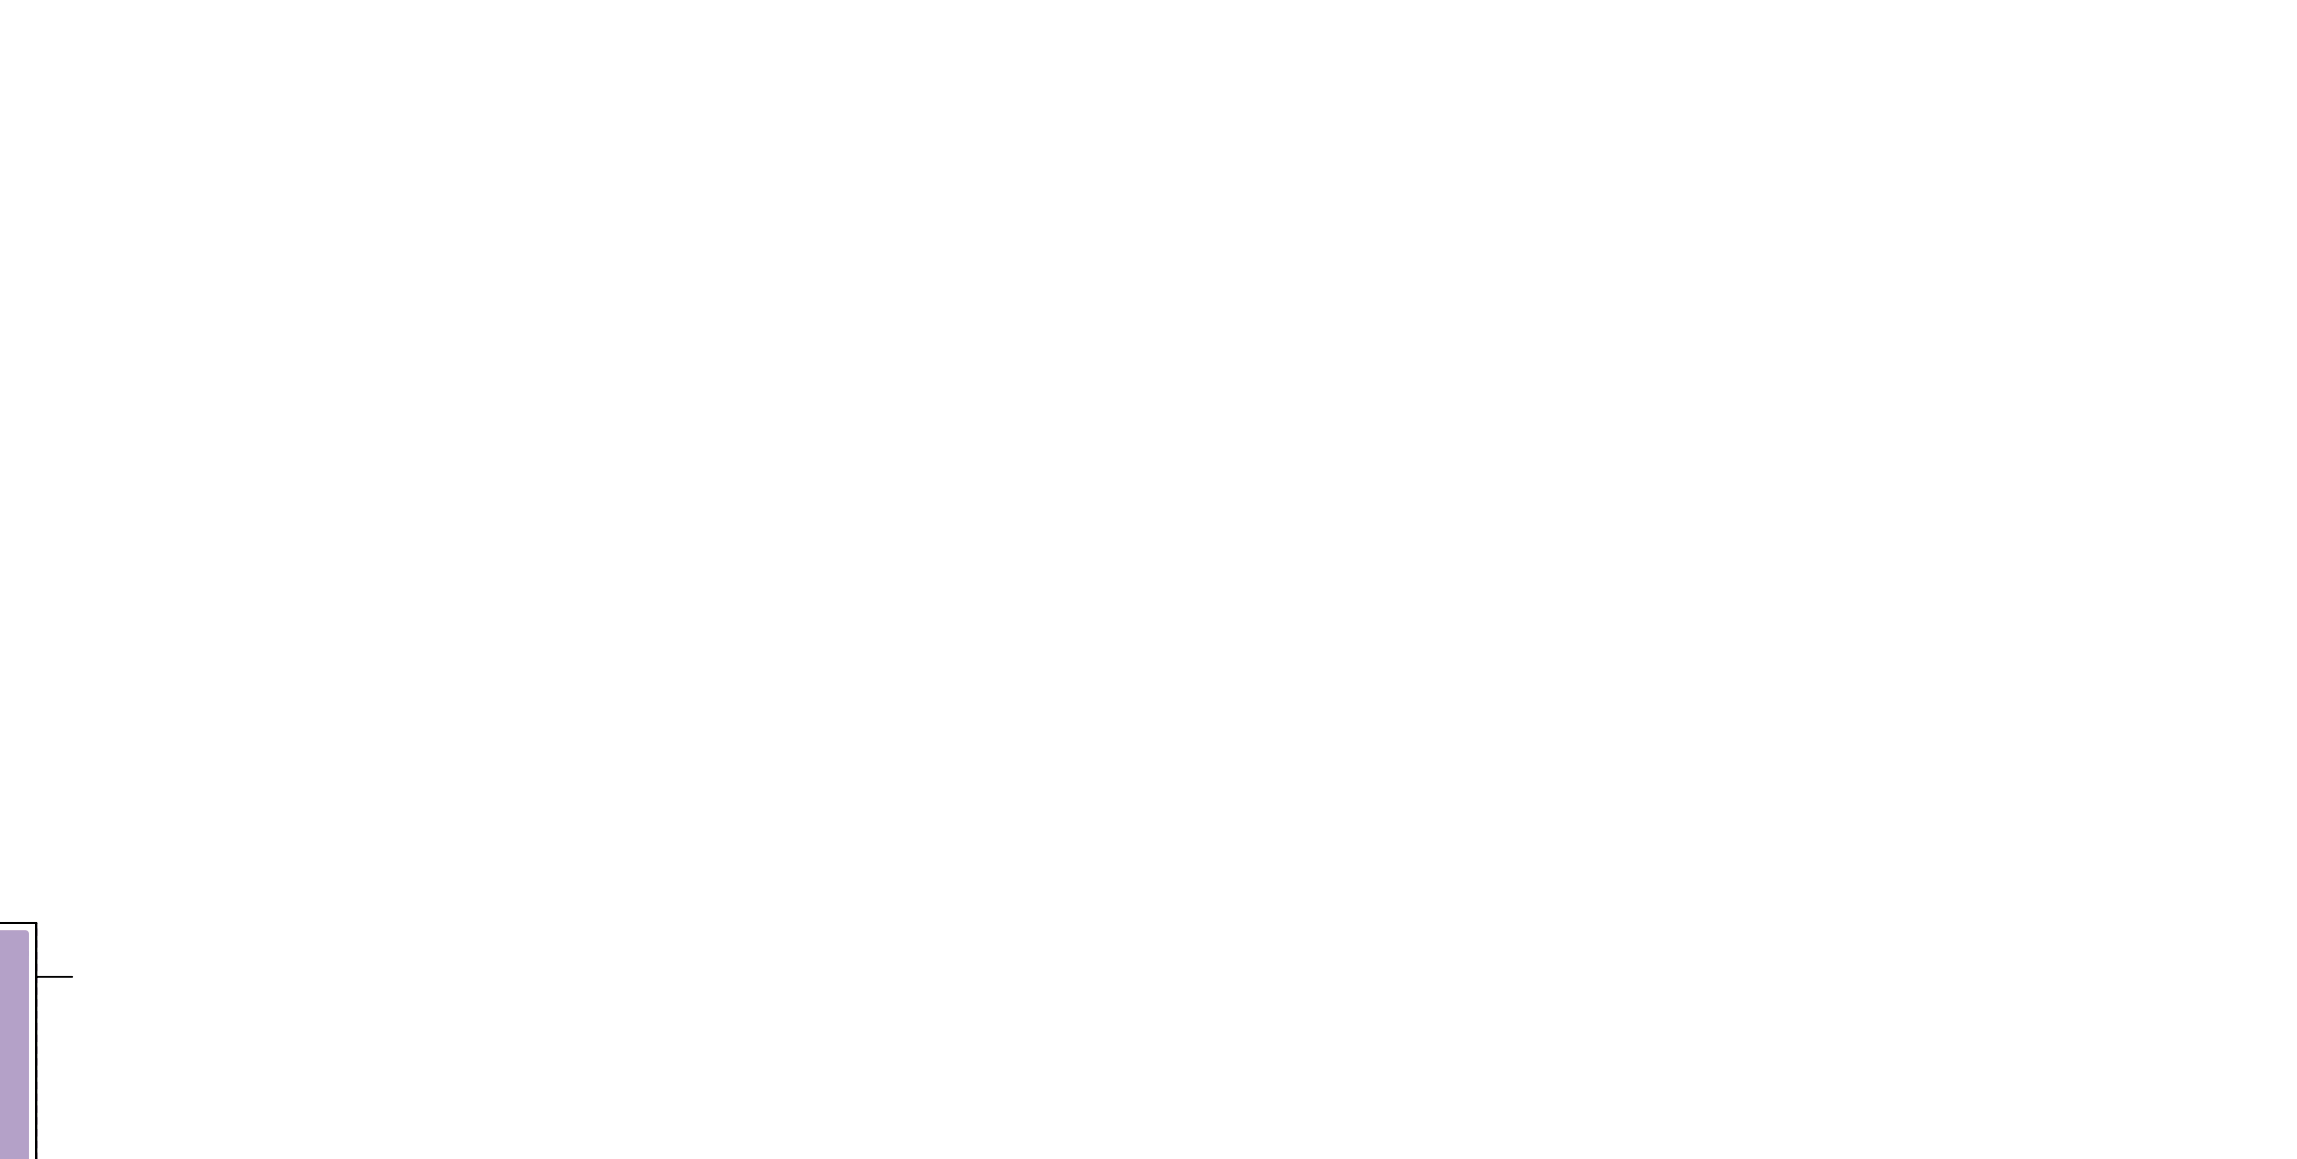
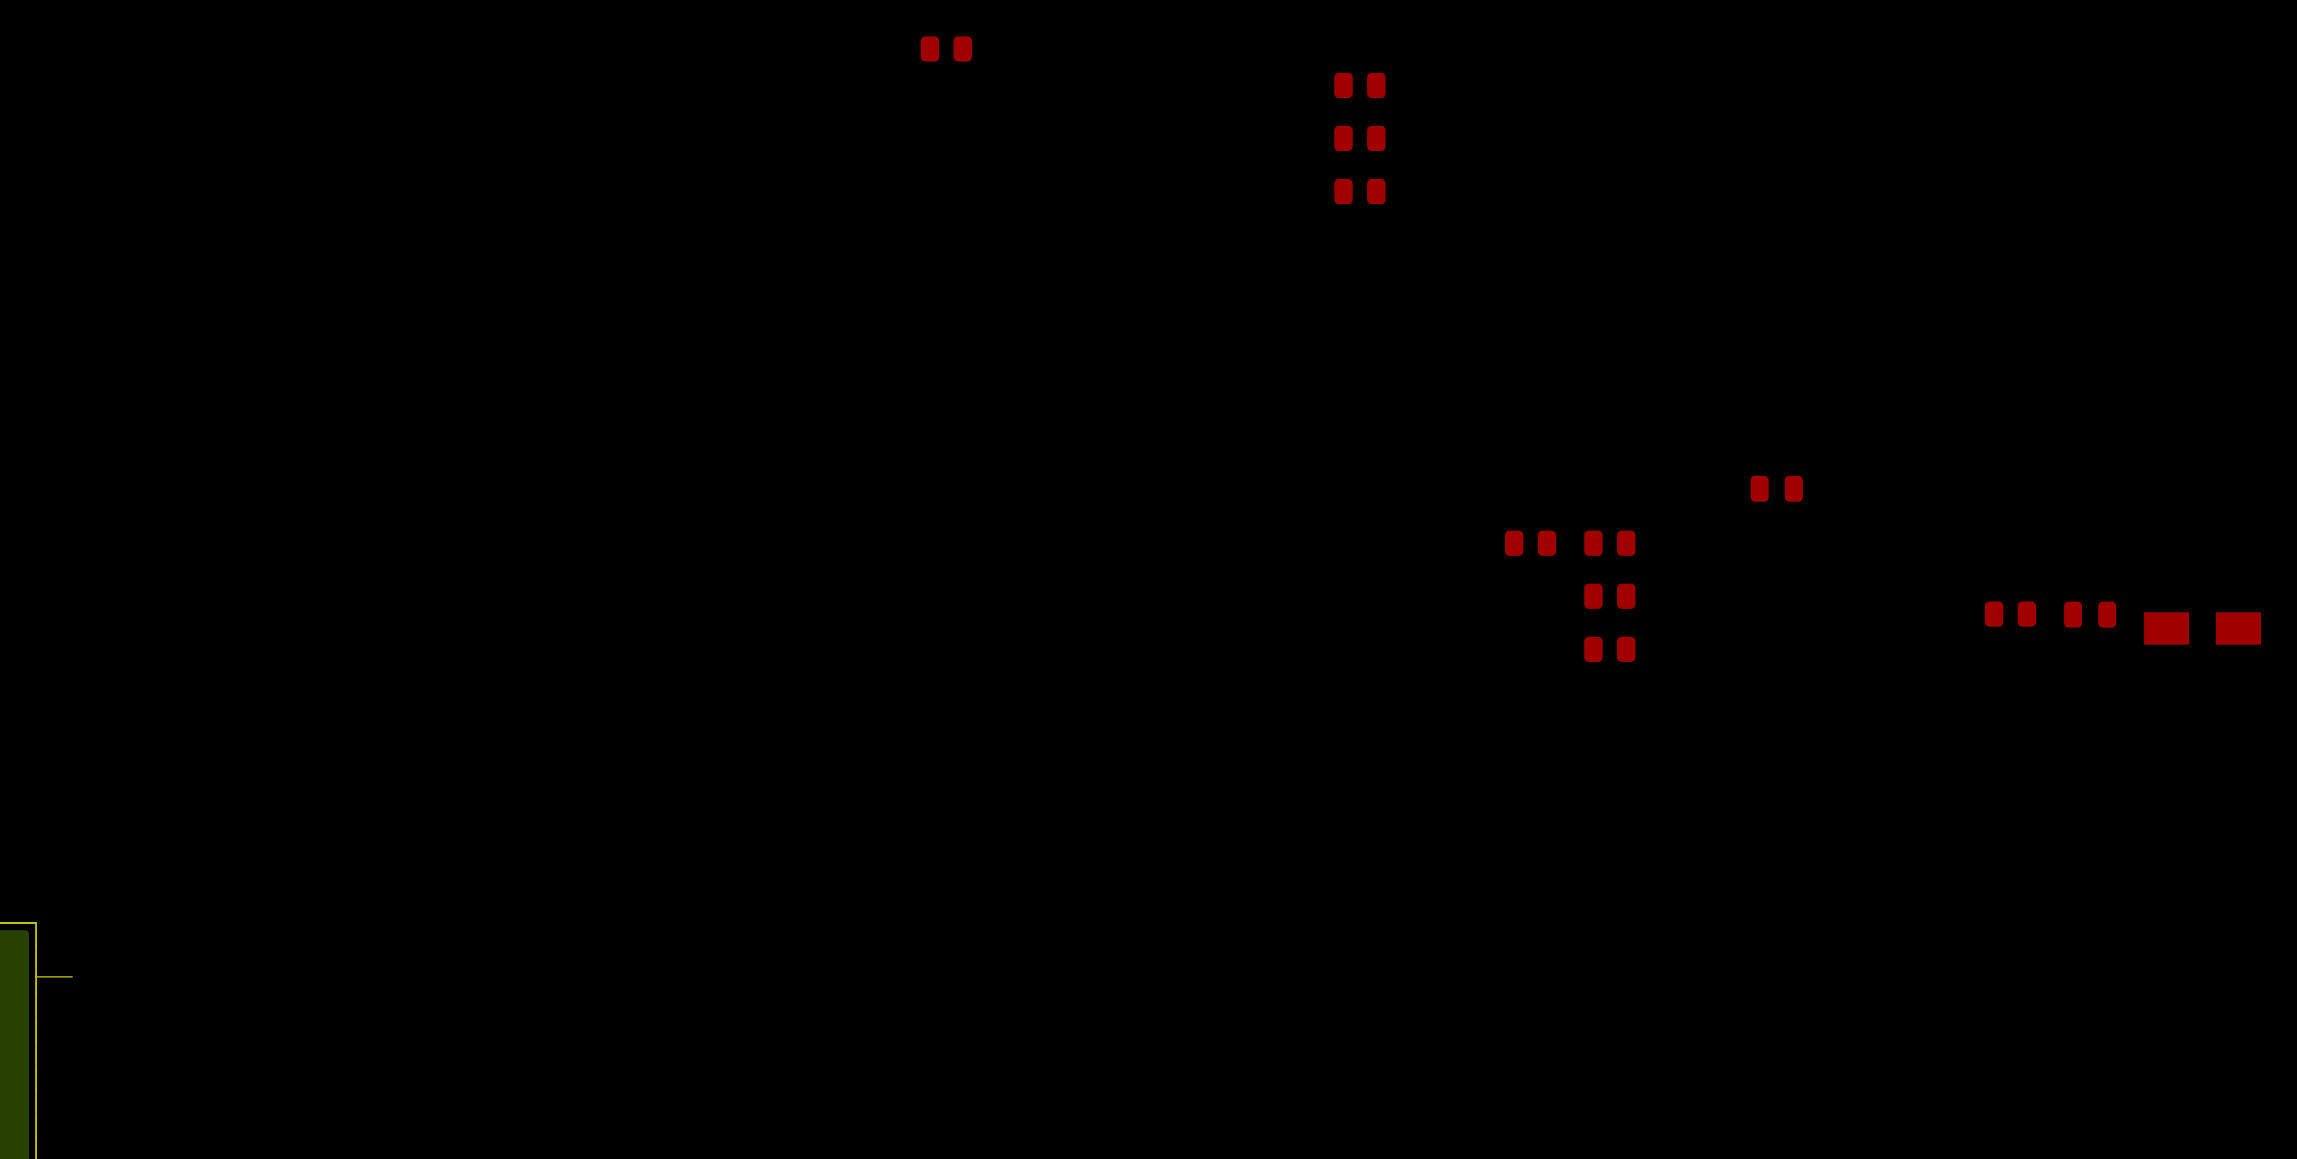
part: none -> (946, 48)
part: none -> (1359, 85)
part: none -> (1359, 138)
part: none -> (1359, 191)
part: none -> (1776, 488)
part: none -> (1530, 543)
part: none -> (1609, 543)
part: none -> (1609, 596)
part: none -> (2010, 614)
part: none -> (2090, 614)
part: none -> (2202, 628)
part: none -> (1609, 649)

